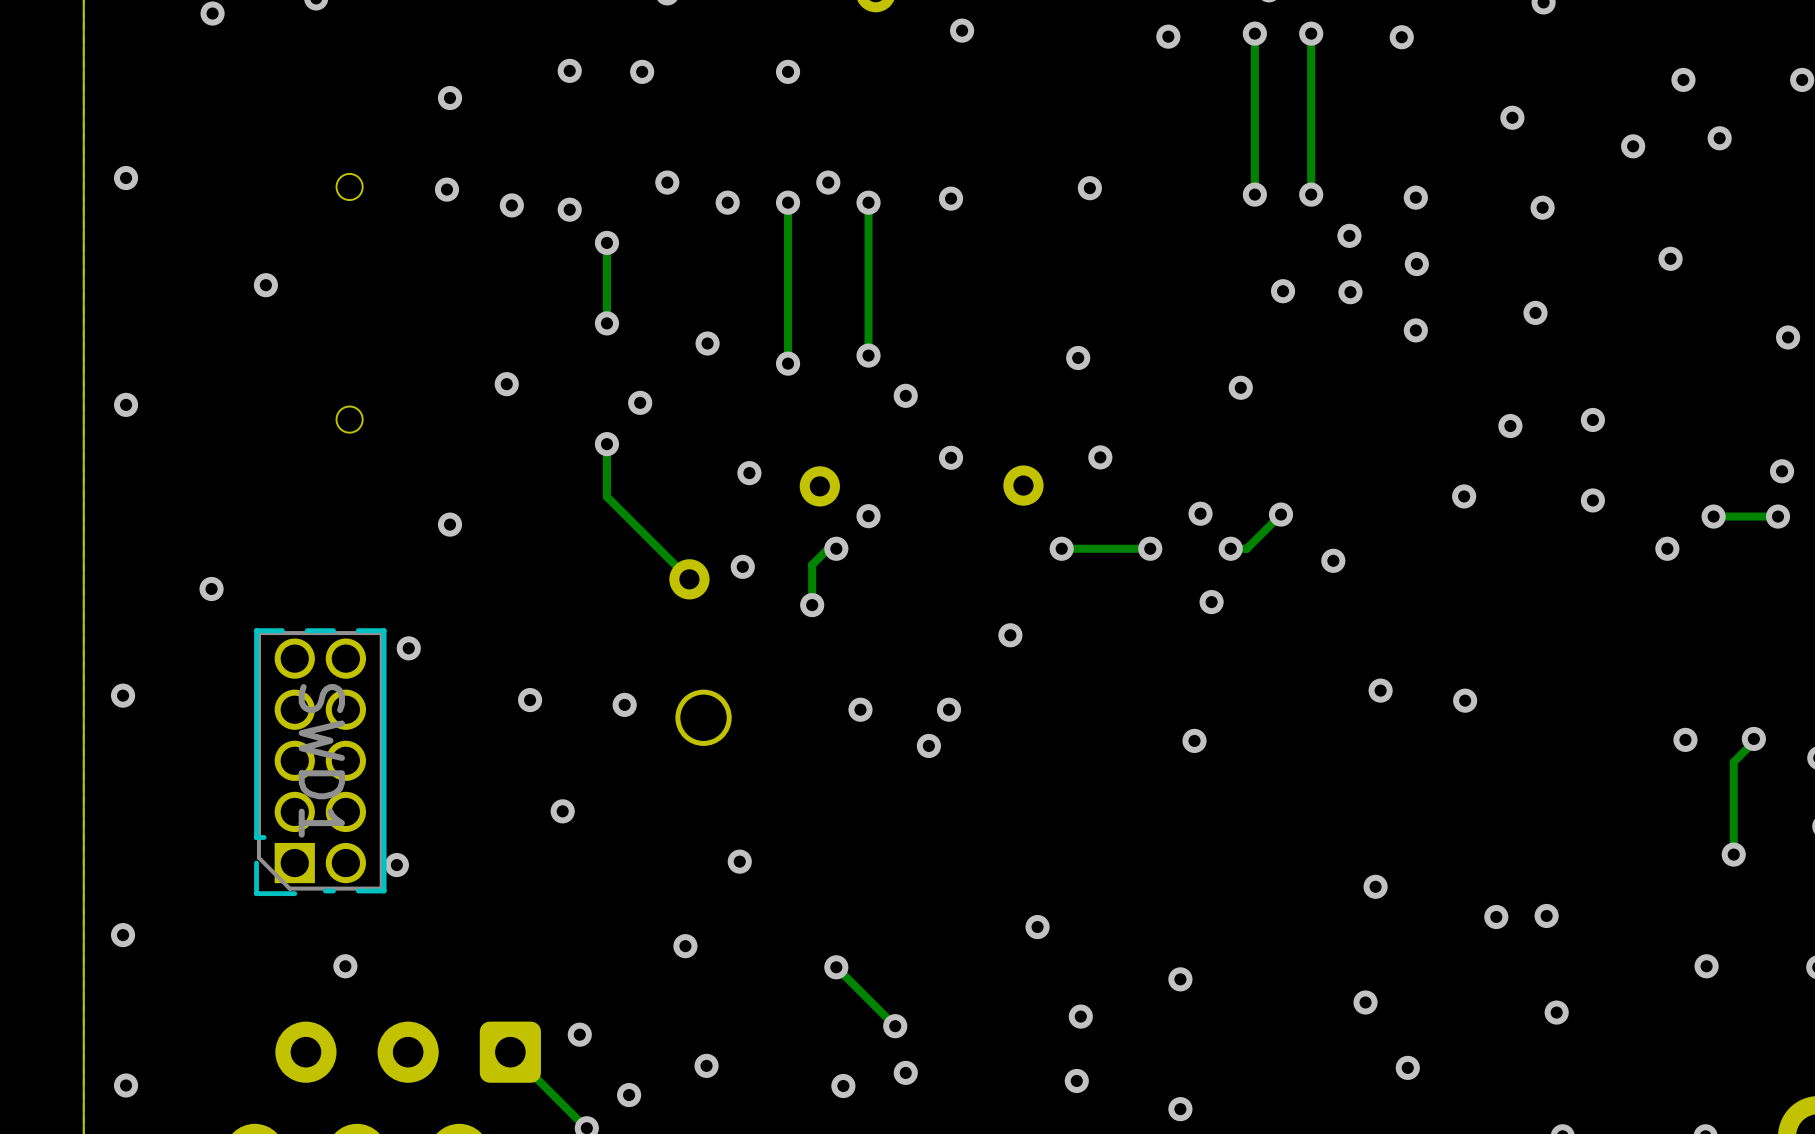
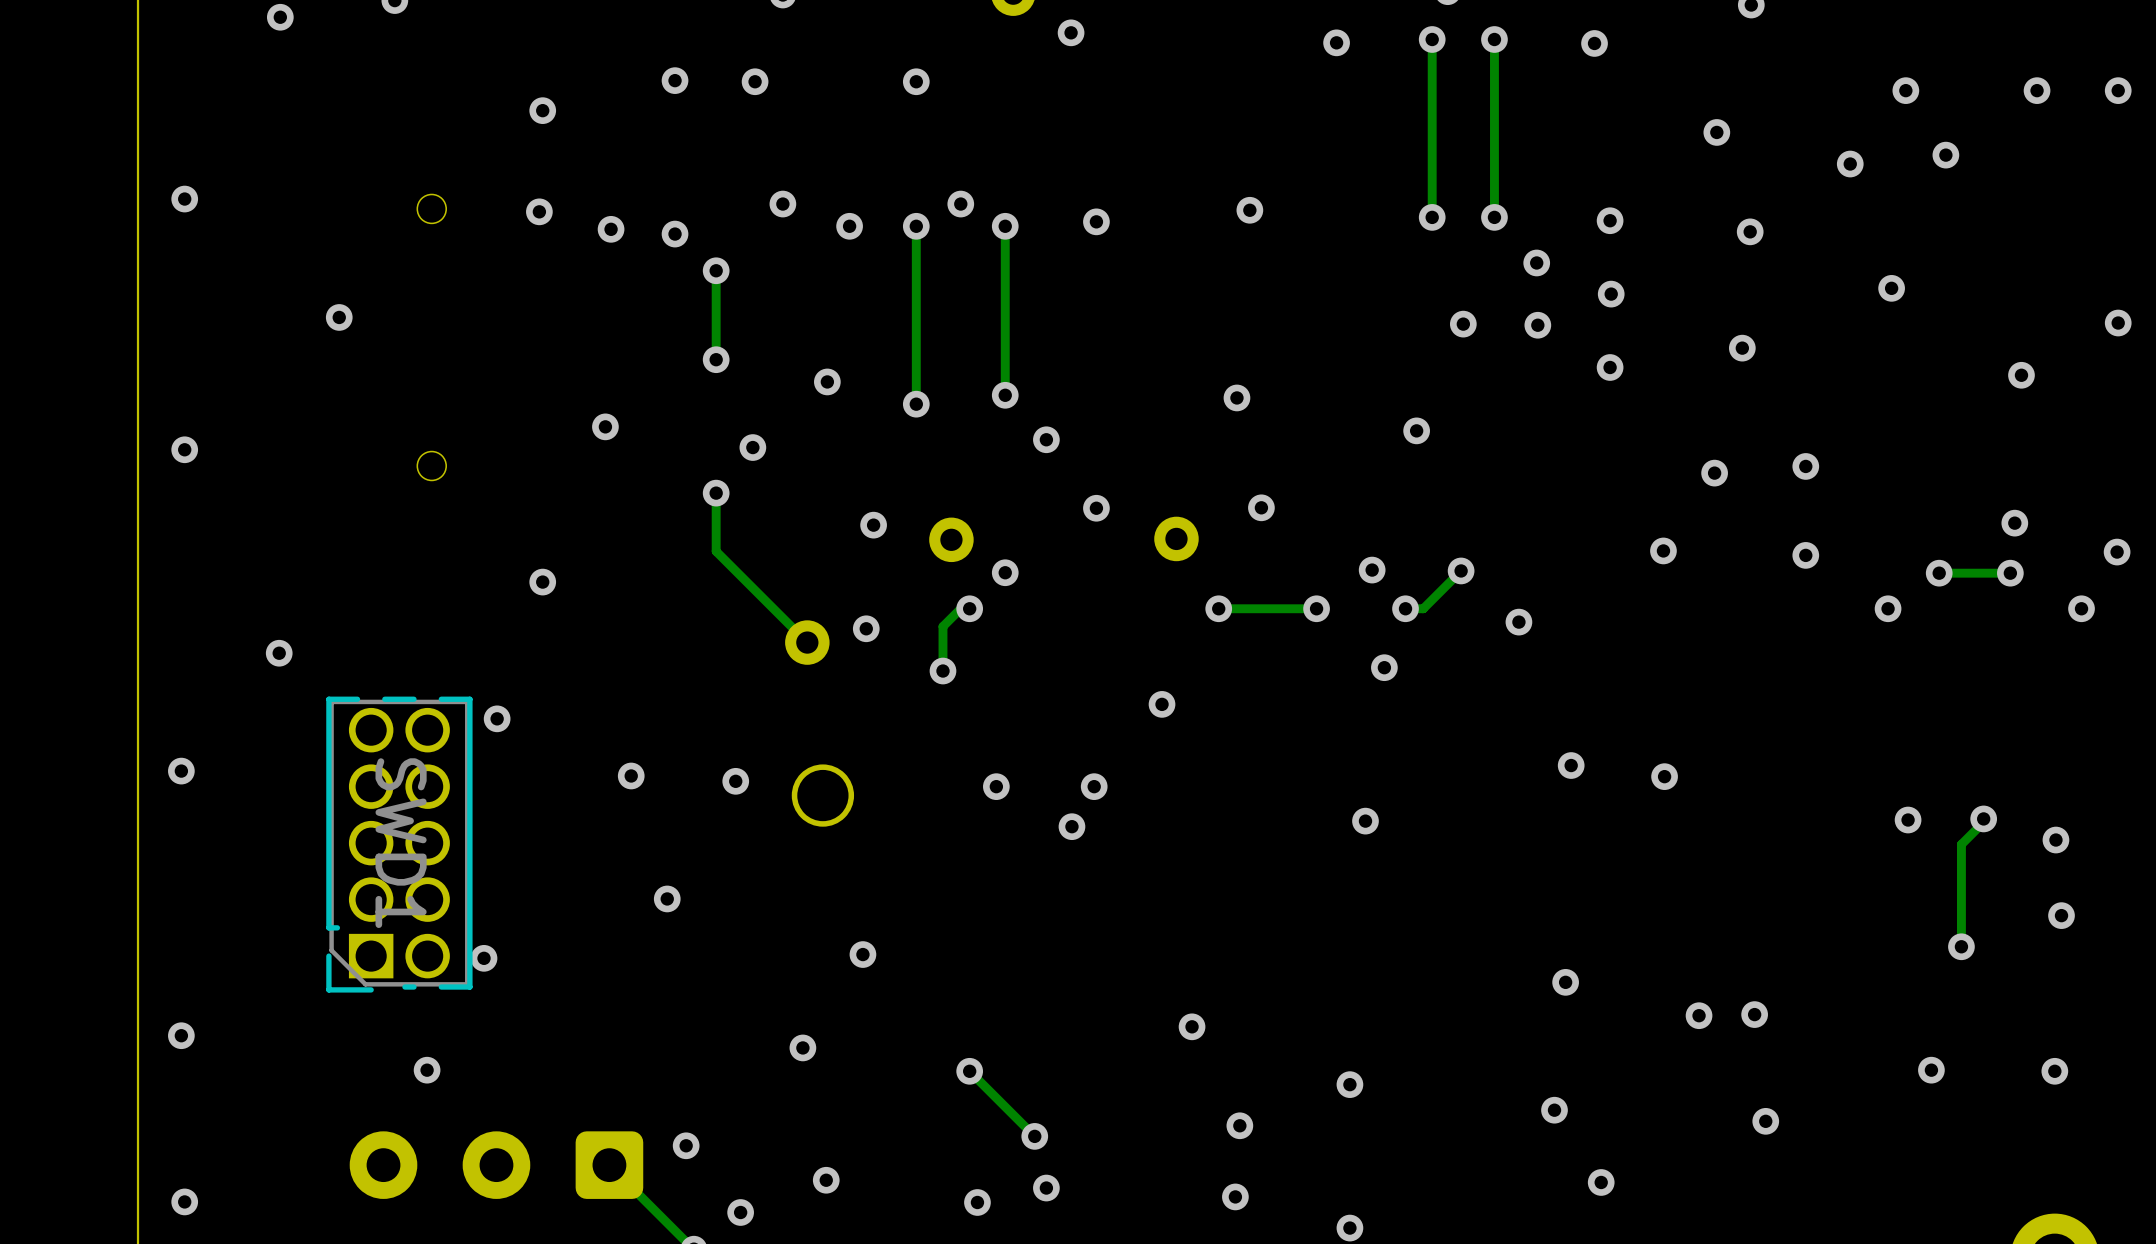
via position: (962, 30) -> (1071, 32)

